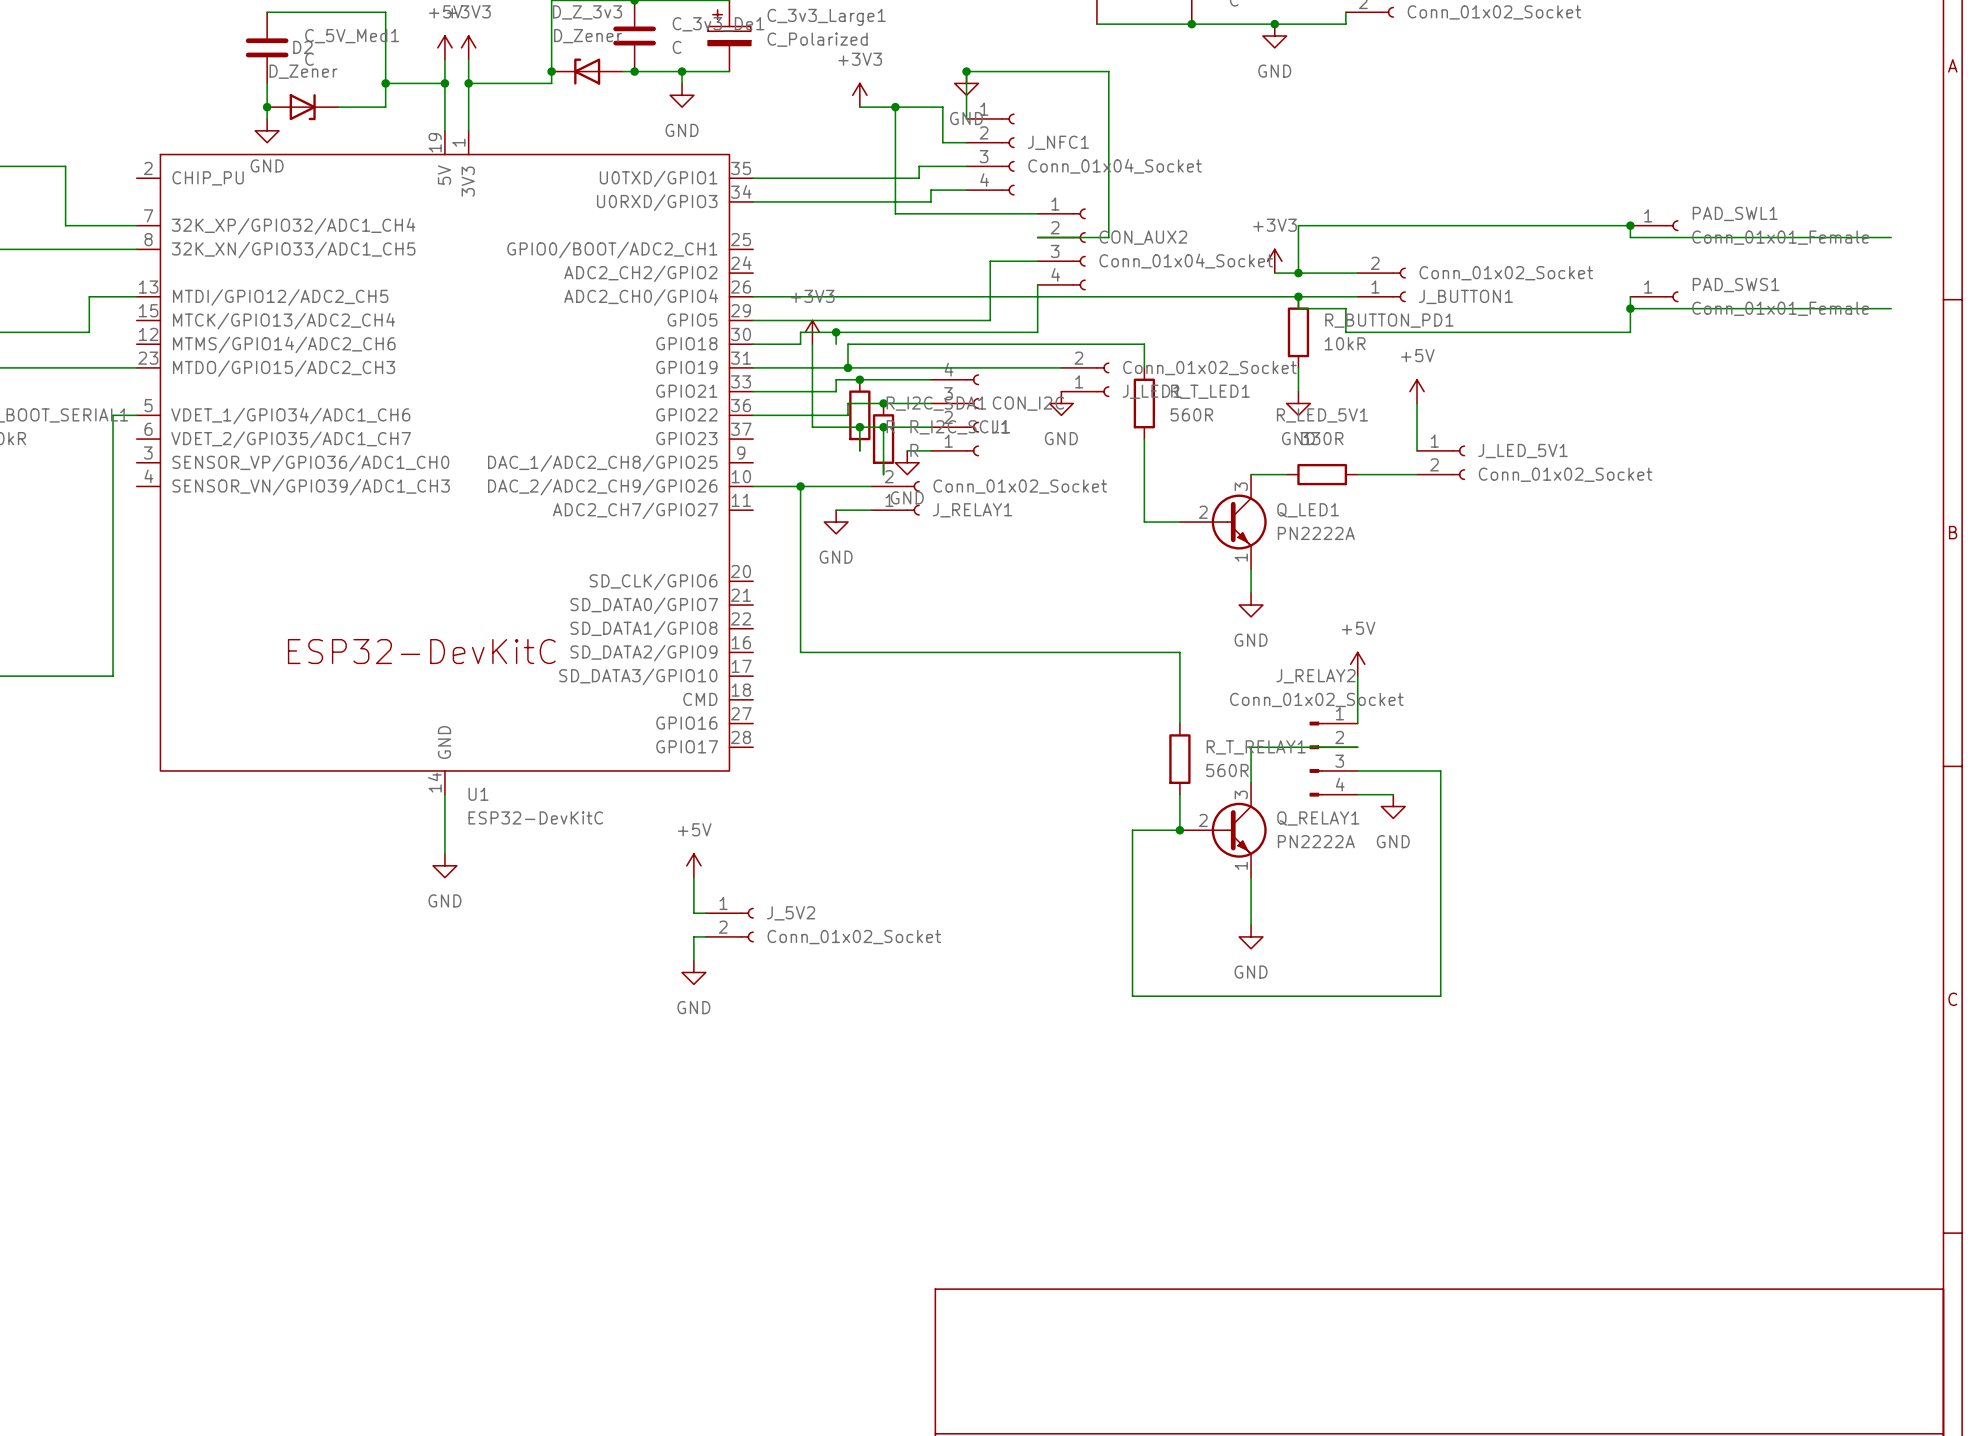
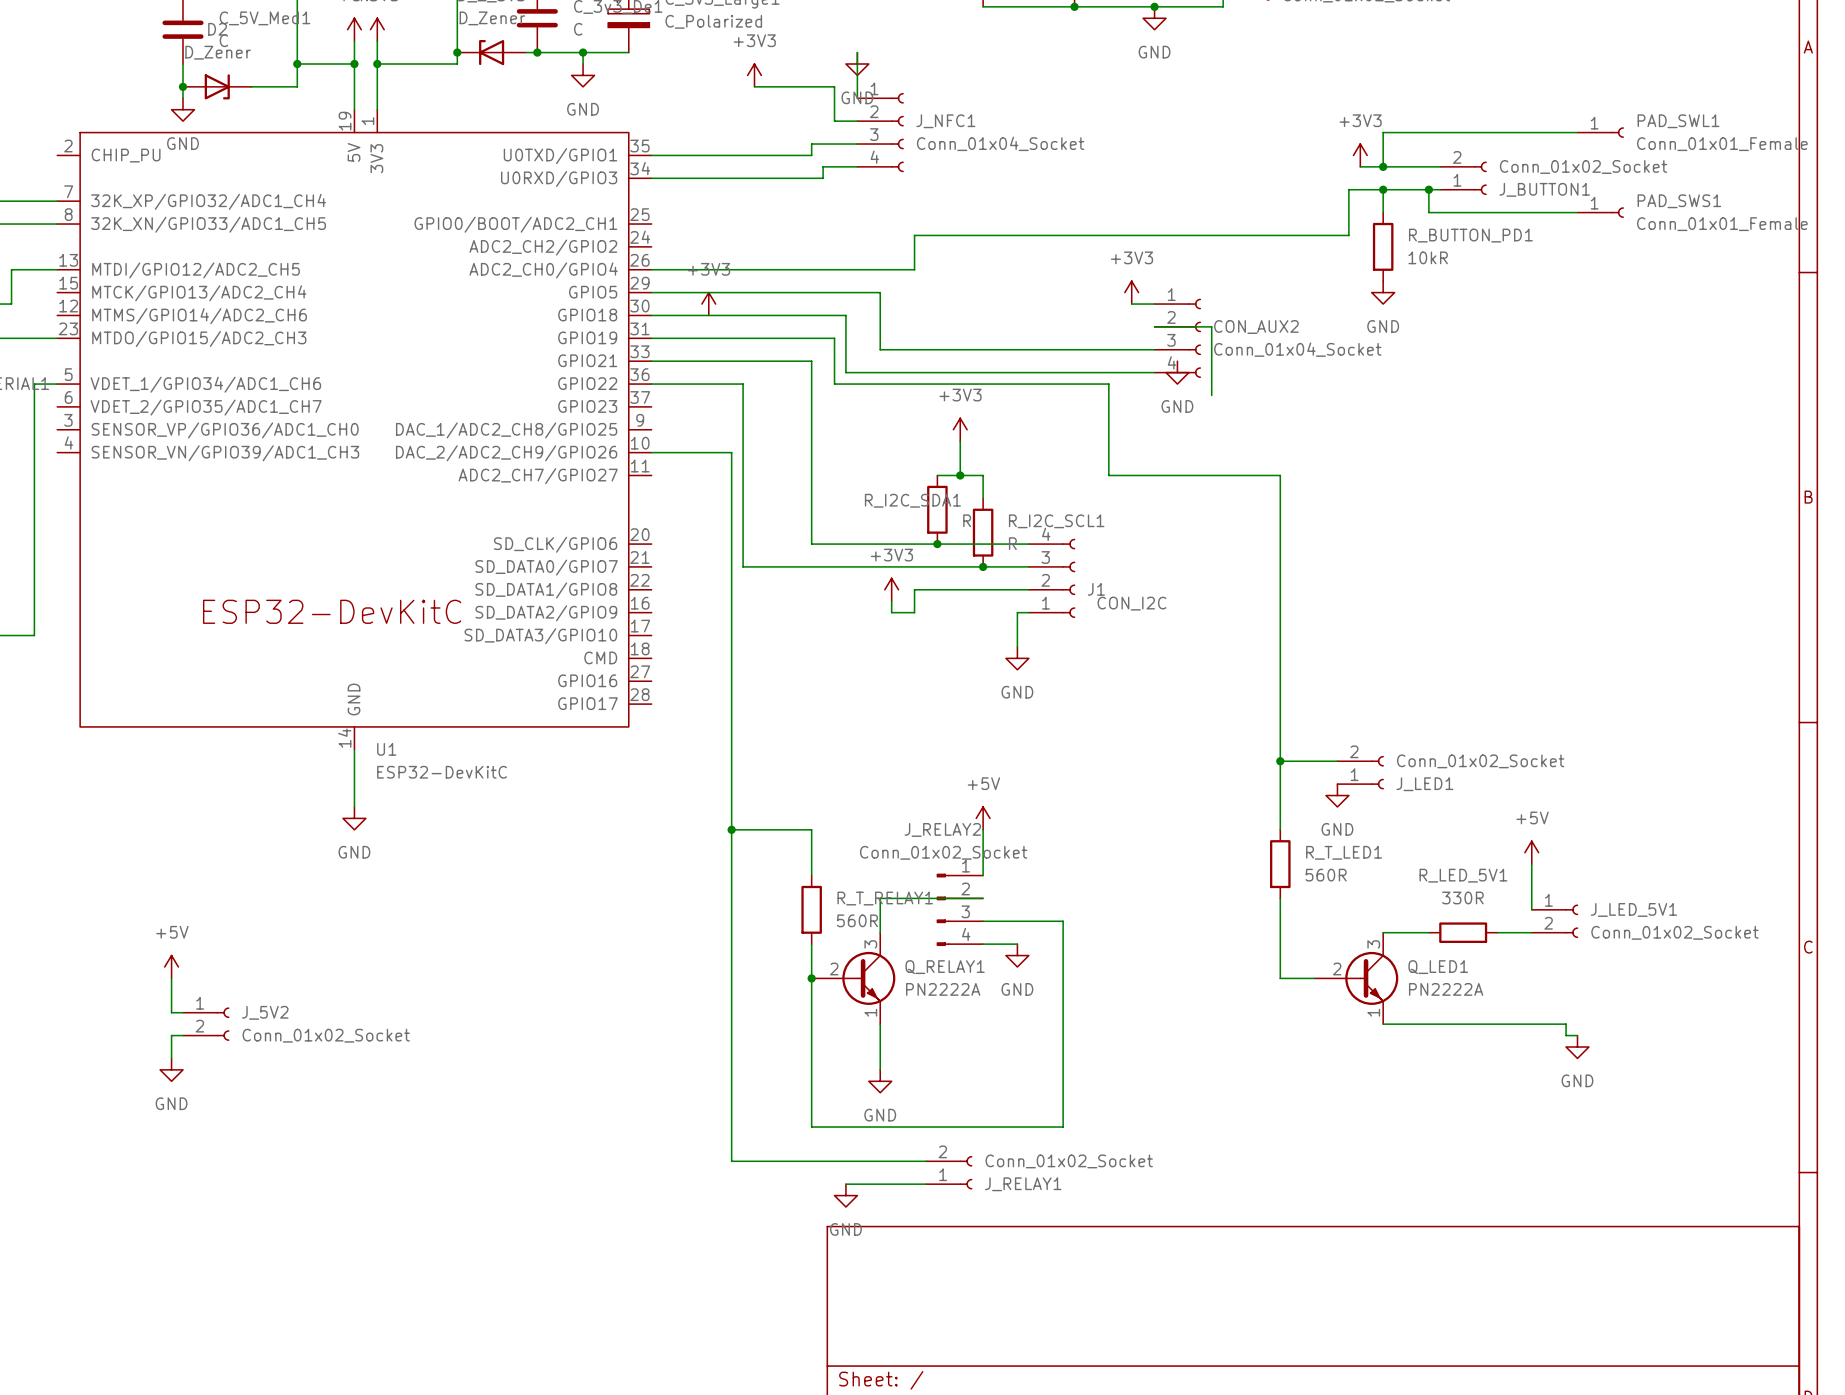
wire: (966, 71) (1108, 71) (1108, 237) (1037, 237) -> none
junction: (966, 71) -> none
wire: (895, 107) (895, 213) (1037, 213) -> none
junction: (895, 107) -> none
wire: none -> (1577, 132) (1383, 132) (1383, 166)
power symbol: none -> +3V3 (1360, 155)
junction: none -> (1383, 166)
wire: none -> (1383, 189) (1383, 212)
junction: none -> (1383, 189)
junction: none -> (1428, 189)
wire: none -> (1440, 189) (1348, 189) (1348, 235) (925, 235)
junction: (1630, 225) -> none
PAD_SWL1 position: (1654, 225) -> (1600, 132)
wire: (1630, 237) (1630, 225) (1298, 225) (1298, 273) -> (1497, 212) (1428, 212) (1428, 189)
wire: (1713, 237) (1891, 237) -> none
CON_AUX2 position: (1061, 249) -> (1177, 338)
wire: (1025, 261) (990, 261) (990, 320) -> (914, 235) (914, 269)
power symbol position: +3V3 (1274, 261) -> +3V3 (1131, 292)
wire: (1274, 273) (1357, 273) -> (1360, 166) (1440, 166)
junction: (1298, 273) -> none
wire: (1037, 284) (1037, 332) (800, 332) (800, 344) -> none
J_BUTTON1 position: (1381, 284) -> (1463, 178)
wire: (1025, 296) (1357, 296) -> none
wire: (1298, 296) (1298, 308) (1345, 308) (1345, 332) (1630, 332) (1630, 296) -> none
junction: (1298, 296) -> none
PAD_SWS1 position: (1654, 296) -> (1600, 212)
wire: (1630, 308) (1891, 308) -> none
junction: (1630, 308) -> none
wire: none -> (880, 292) (880, 349) (1154, 349)
power symbol: none -> GND (1383, 292)
wire: (836, 332) (836, 344) -> none
junction: (836, 332) -> none
wire: none -> (1131, 304) (1154, 304)
R_BUTTON_PD1 position: (1298, 332) -> (1383, 246)
wire: (812, 344) (812, 427) (930, 427) -> none
wire: (847, 344) (847, 367) -> (743, 315) (697, 315)
wire: (954, 344) (1144, 344) (1144, 367) -> (845, 315) (845, 372) (1154, 372)
wire: none -> (1154, 326) (1211, 326) (1211, 395)
junction: (847, 367) -> none
wire: (942, 367) (1061, 367) -> (834, 338) (834, 384) (1108, 384) (1108, 475) (1280, 475) (1280, 829)
wire: (1298, 367) (1298, 391) -> none
junction: (859, 379) -> none
wire: (930, 379) (836, 379) (836, 391) -> (1028, 544) (811, 544) (811, 361) (731, 361)
J_LED1 position: (1085, 379) -> (1360, 772)
power symbol: +5V (1417, 391) -> none
junction: (883, 403) -> none
wire: (930, 403) (847, 403) (847, 415) -> (1028, 566) (743, 566) (743, 384)
R_I2C_SDA1 name position: R_I2C_SDA1 (936, 403) -> R_I2C_SDA1 (912, 500)
J1 value position: CON_I2C (1028, 403) -> CON_I2C (1131, 603)
power symbol: GND (1061, 403) -> none
R_T_LED1 position: (1144, 403) -> (1280, 864)
wire: (1417, 403) (1417, 450) -> none
R_I2C_SDA1 position: (859, 415) -> (937, 509)
J1 position: (955, 415) -> (1052, 578)
wire: (859, 427) (859, 450) -> none
junction: (859, 427) -> none
wire: (883, 427) (883, 474) -> none
junction: (883, 427) -> none
R_I2C_SCL1 position: (883, 439) -> (983, 532)
wire: (1144, 439) (1144, 522) (1179, 522) -> none
wire: (907, 450) (930, 450) -> none
power symbol: GND (907, 462) -> none
power symbol: none -> +3V3 (960, 429)
J_LED_5V1 position: (1441, 462) -> (1554, 921)
wire: none -> (960, 441) (960, 475)
wire: (1251, 474) (1286, 474) -> none
R_LED_5V1 position: (1322, 474) -> (1463, 932)
wire: (1357, 474) (1417, 474) -> none
wire: (800, 486) (800, 652) (1002, 652) -> (891, 601) (891, 612)
junction: (800, 486) -> none
wire: (836, 486) (871, 486) -> (731, 452) (731, 1161) (925, 1161)
J_RELAY1 position: (895, 498) -> (949, 1172)
wire: (836, 510) (871, 510) -> none
wire: none -> (937, 475) (983, 475) (983, 498)
junction: none -> (960, 475)
power symbol: GND (836, 522) -> none
Q_LED1 position: (1223, 522) -> (1356, 978)
wire: (1251, 569) (1251, 593) -> none
junction: none -> (937, 544)
junction: none -> (983, 566)
power symbol: GND (1251, 605) -> none
power symbol: none -> +3V3 (891, 589)
wire: (1025, 652) (1132, 652) -> (914, 612) (914, 589) (1028, 589)
wire: none -> (1017, 612) (1017, 646)
wire: (1144, 652) (1179, 652) (1179, 723) -> none
power symbol: +5V (1357, 664) -> none
wire: (1357, 676) (1357, 723) -> none
power symbol: none -> GND (1017, 658)
wire: (1357, 747) (1251, 747) (1251, 782) -> none
R_T_RELAY1 position: (1179, 759) -> (811, 909)
J_RELAY2 position: (1333, 759) -> (959, 909)
wire: (1357, 770) (1440, 770) (1440, 996) (1132, 996) (1132, 830) (1179, 830) (1179, 794) -> none
wire: (1357, 794) (1393, 794) -> none
power symbol position: GND (1393, 806) -> GND (1337, 795)
wire: none -> (1280, 761) (1337, 761)
junction: none -> (1280, 761)
junction: (1179, 830) -> none
Q_RELAY1 position: (1223, 830) -> (853, 978)
power symbol: +5V (693, 865) -> none
power symbol: none -> +5V (983, 818)
wire: (693, 877) (693, 913) (705, 913) -> none
wire: none -> (731, 829) (811, 829) (811, 875)
junction: none -> (731, 829)
wire: (1251, 877) (1251, 925) -> (983, 829) (983, 875)
power symbol: none -> +5V (1531, 852)
wire: none -> (1531, 864) (1531, 909)
J_5V2 position: (729, 925) -> (206, 1024)
wire: (705, 936) (693, 936) (693, 960) -> none
power symbol: GND (1251, 936) -> none
wire: none -> (983, 898) (880, 898) (880, 932)
wire: none -> (1280, 898) (1280, 978) (1314, 978)
power symbol: GND (693, 972) -> none
wire: none -> (983, 921) (1063, 921) (1063, 1127) (811, 1127) (811, 944)
wire: none -> (1383, 932) (1428, 932)
wire: none -> (1497, 932) (1531, 932)
wire: none -> (983, 944) (1017, 944)
power symbol: none -> GND (1017, 955)
power symbol: none -> +5V (171, 966)
wire: none -> (171, 978) (171, 1012) (182, 1012)
junction: none -> (811, 978)
wire: none -> (880, 1024) (880, 1069)
wire: none -> (1383, 1024) (1566, 1024) (1566, 1035) (1577, 1035)
wire: none -> (182, 1035) (171, 1035) (171, 1058)
power symbol: none -> GND (1577, 1047)
power symbol: none -> GND (171, 1069)
power symbol: none -> GND (880, 1081)
wire: none -> (845, 1184) (925, 1184)
power symbol: none -> GND (845, 1195)

